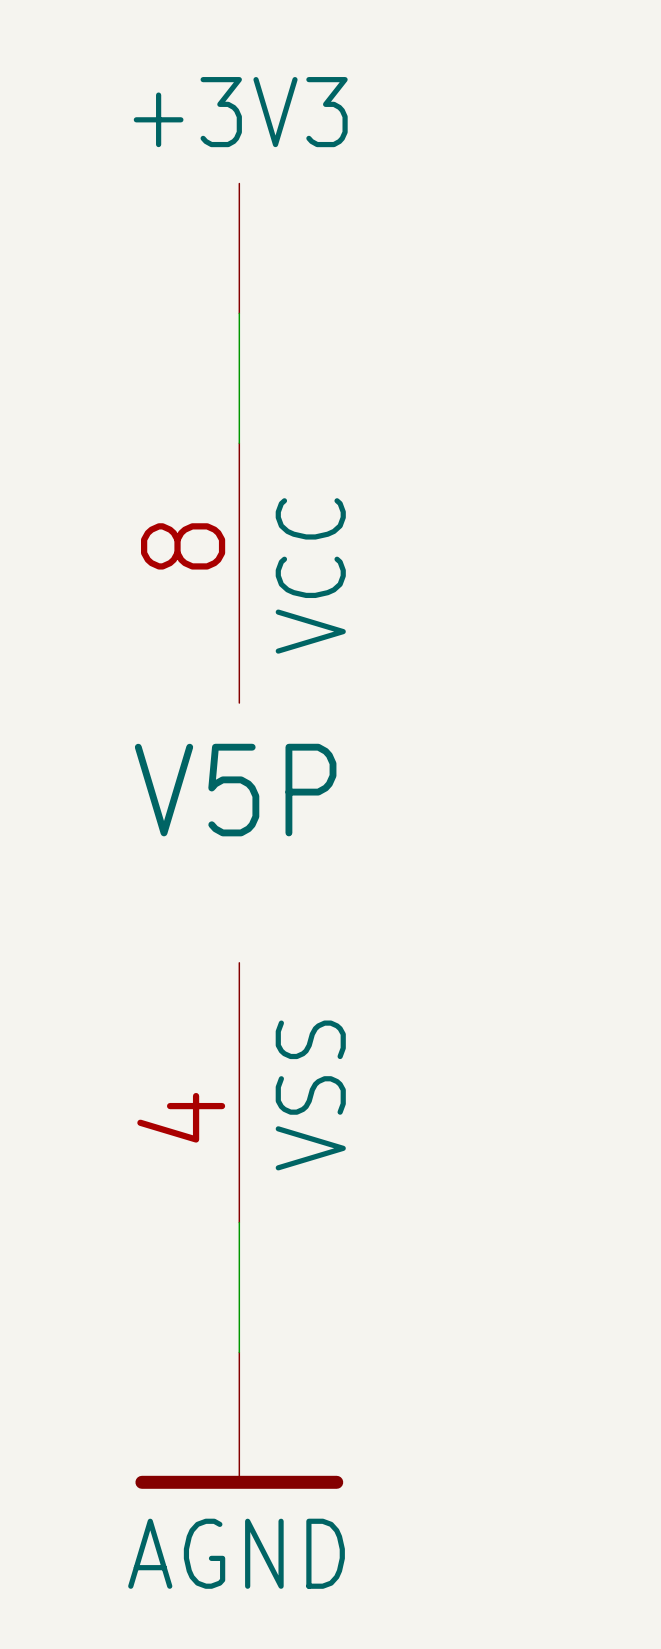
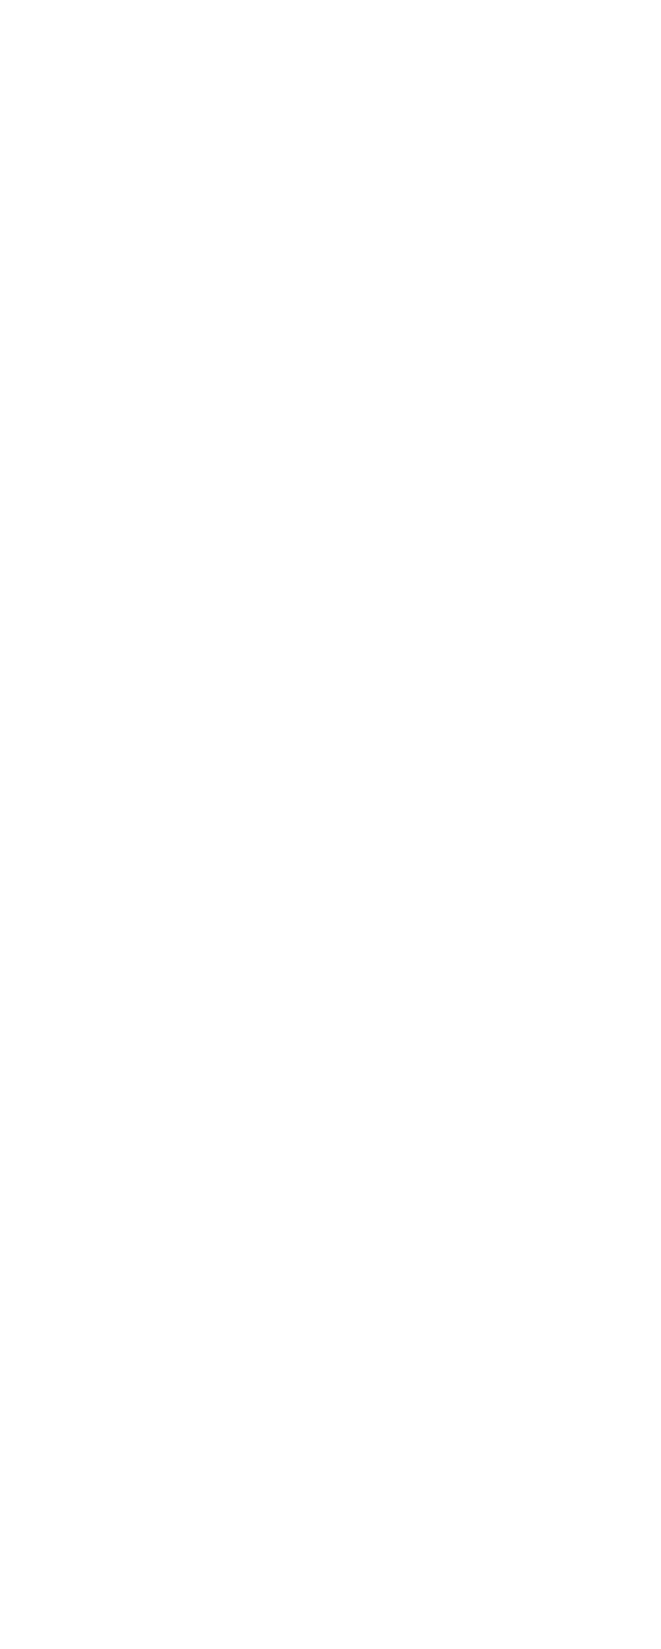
power symbol: +3V3 (239, 248) -> none
wire: (239, 313) (239, 443) -> none
V5P: (239, 832) -> none
wire: (239, 1222) (239, 1352) -> none
power symbol: AGND (239, 1420) -> none

